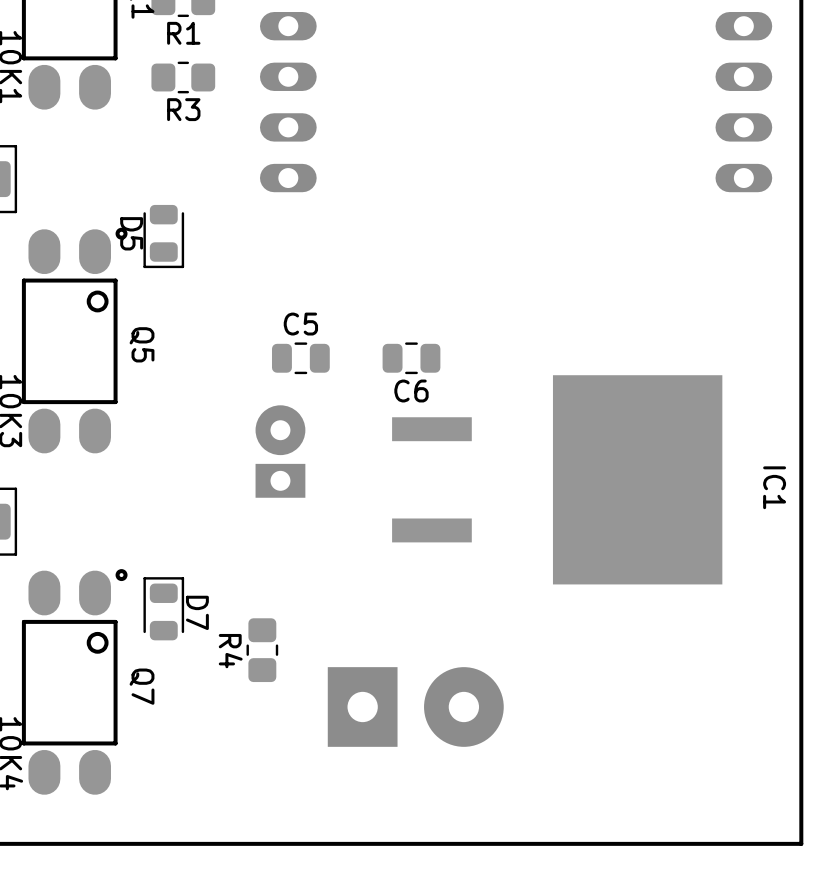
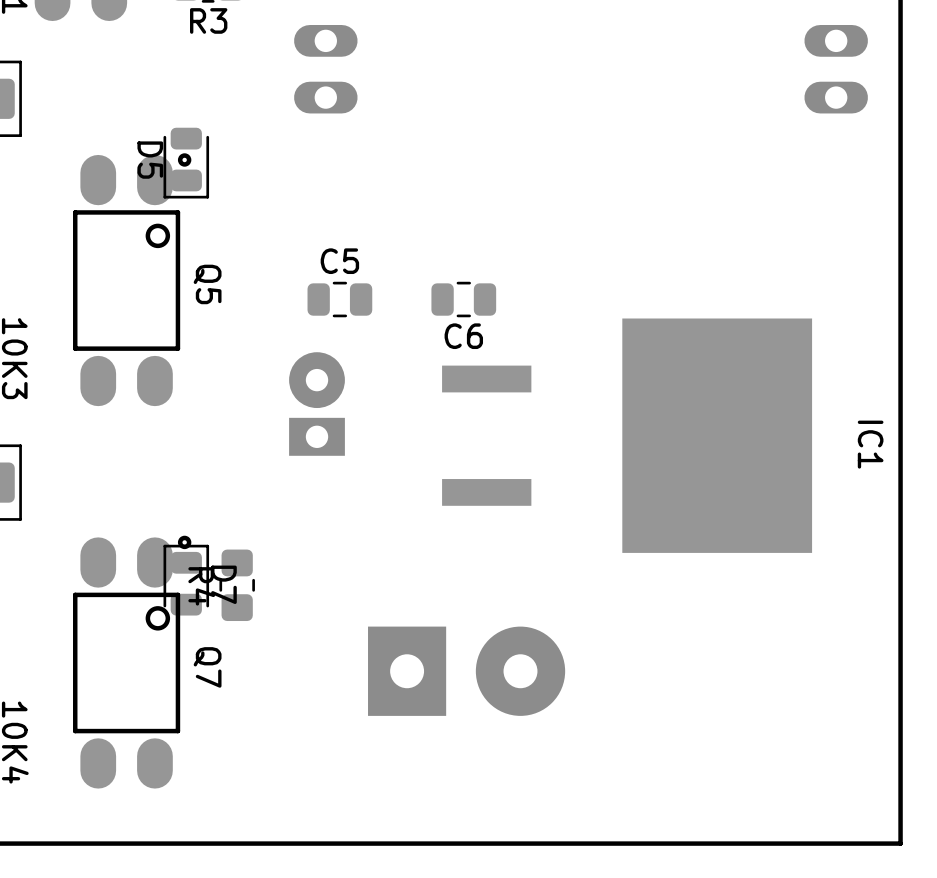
Q5 position: (74, 340) -> (132, 279)
R4 position: (262, 650) -> (237, 585)
Q7 position: (74, 681) -> (132, 662)
part position: (415, 706) -> (466, 671)

